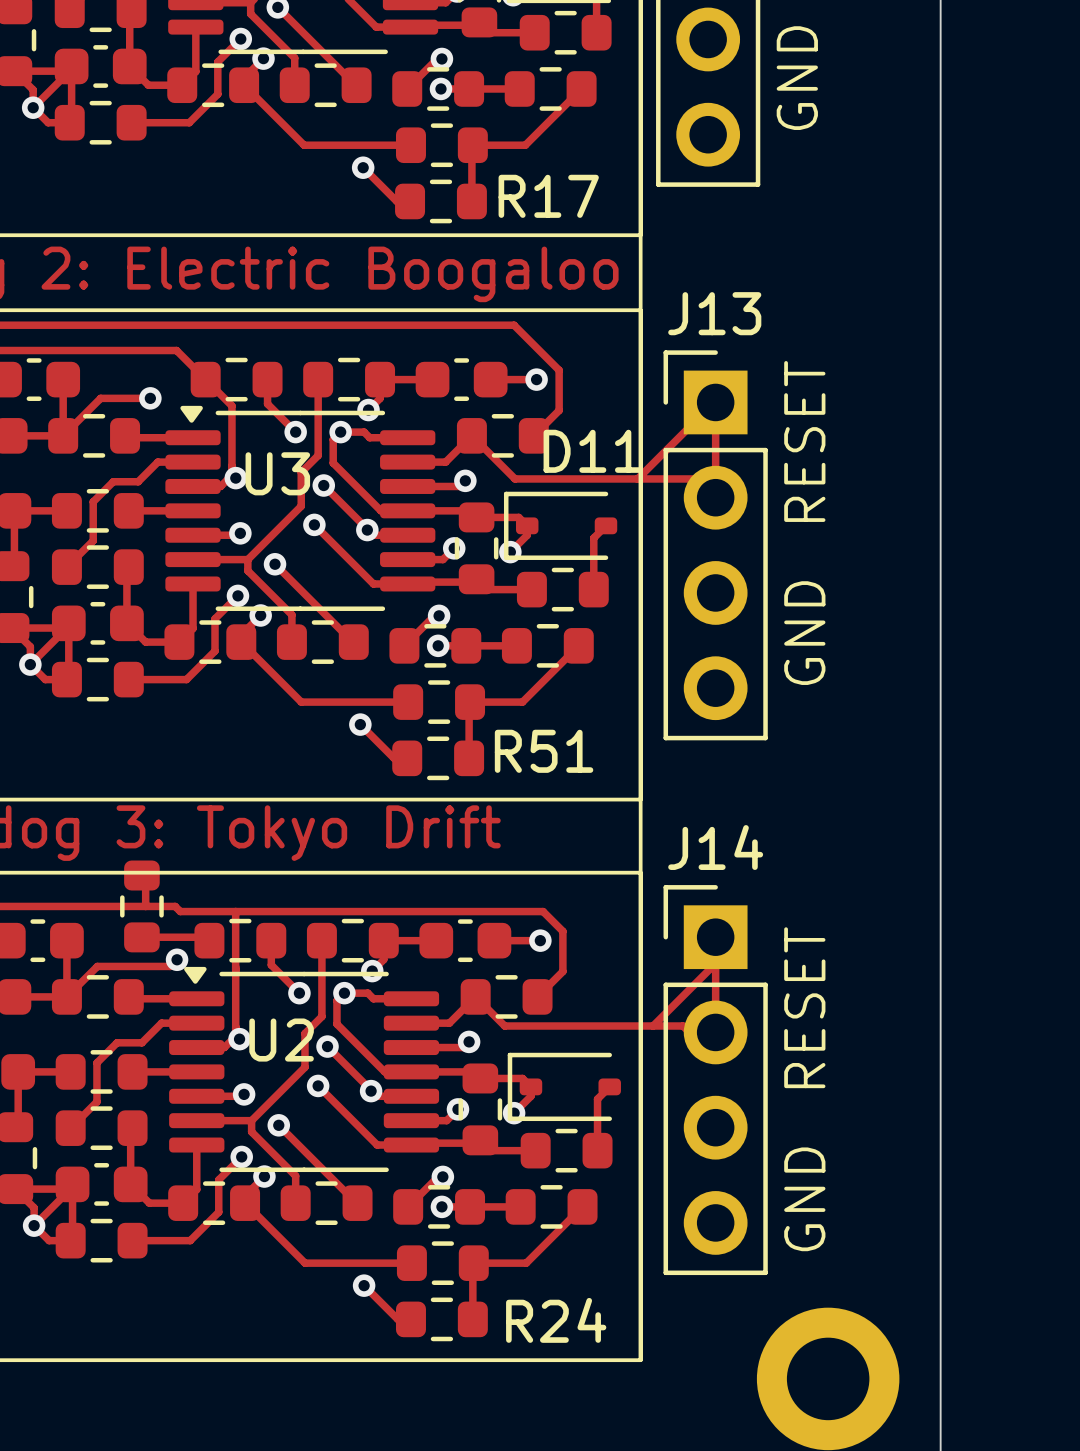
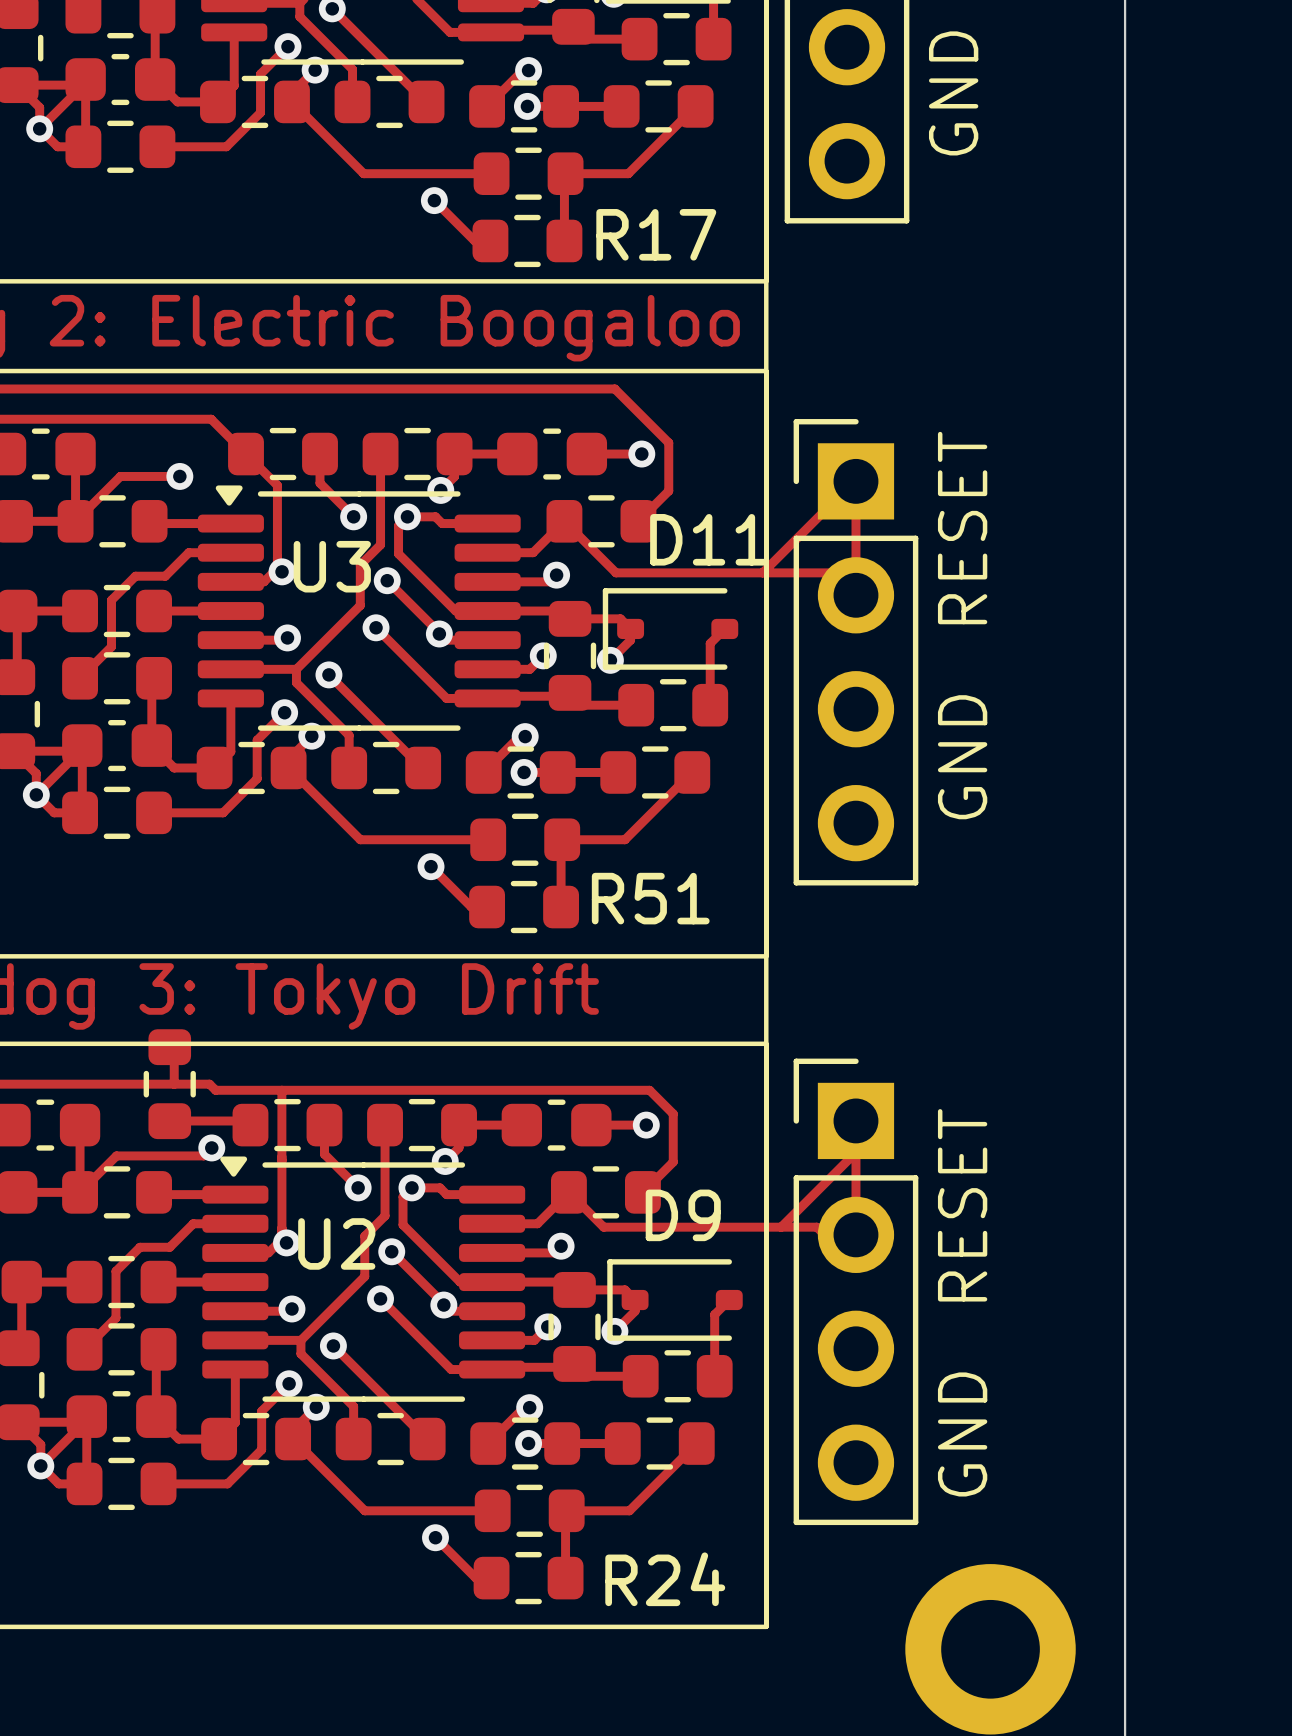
J13 name: J13 (714, 313) -> none
J14 name: J14 (715, 847) -> none
D9 name: none -> D9 (683, 1215)

